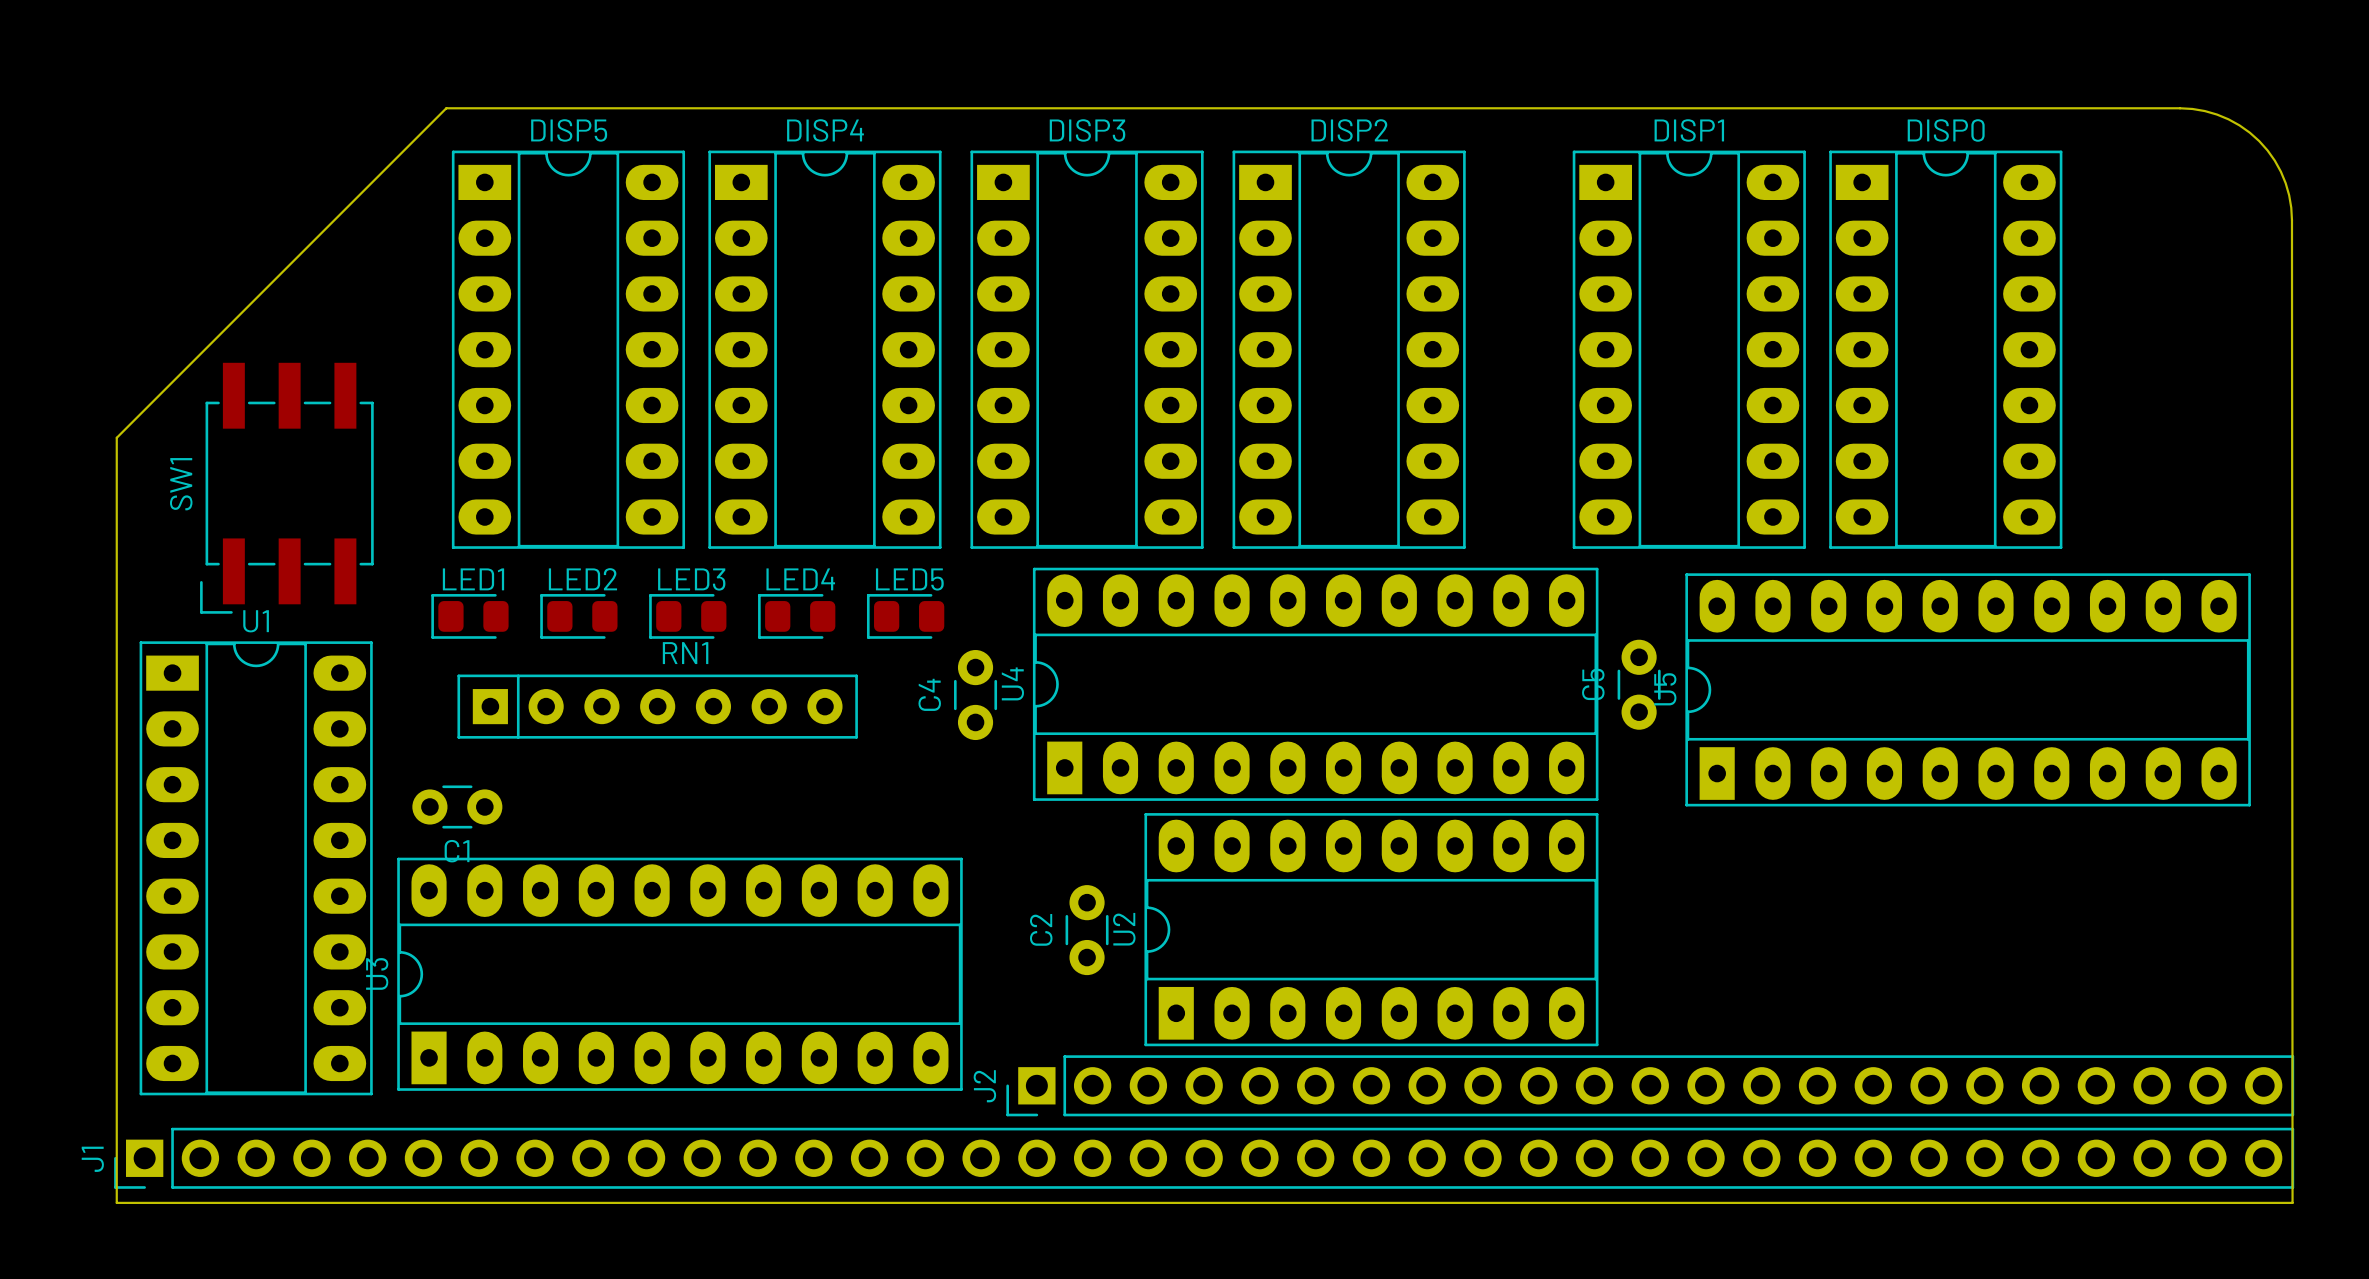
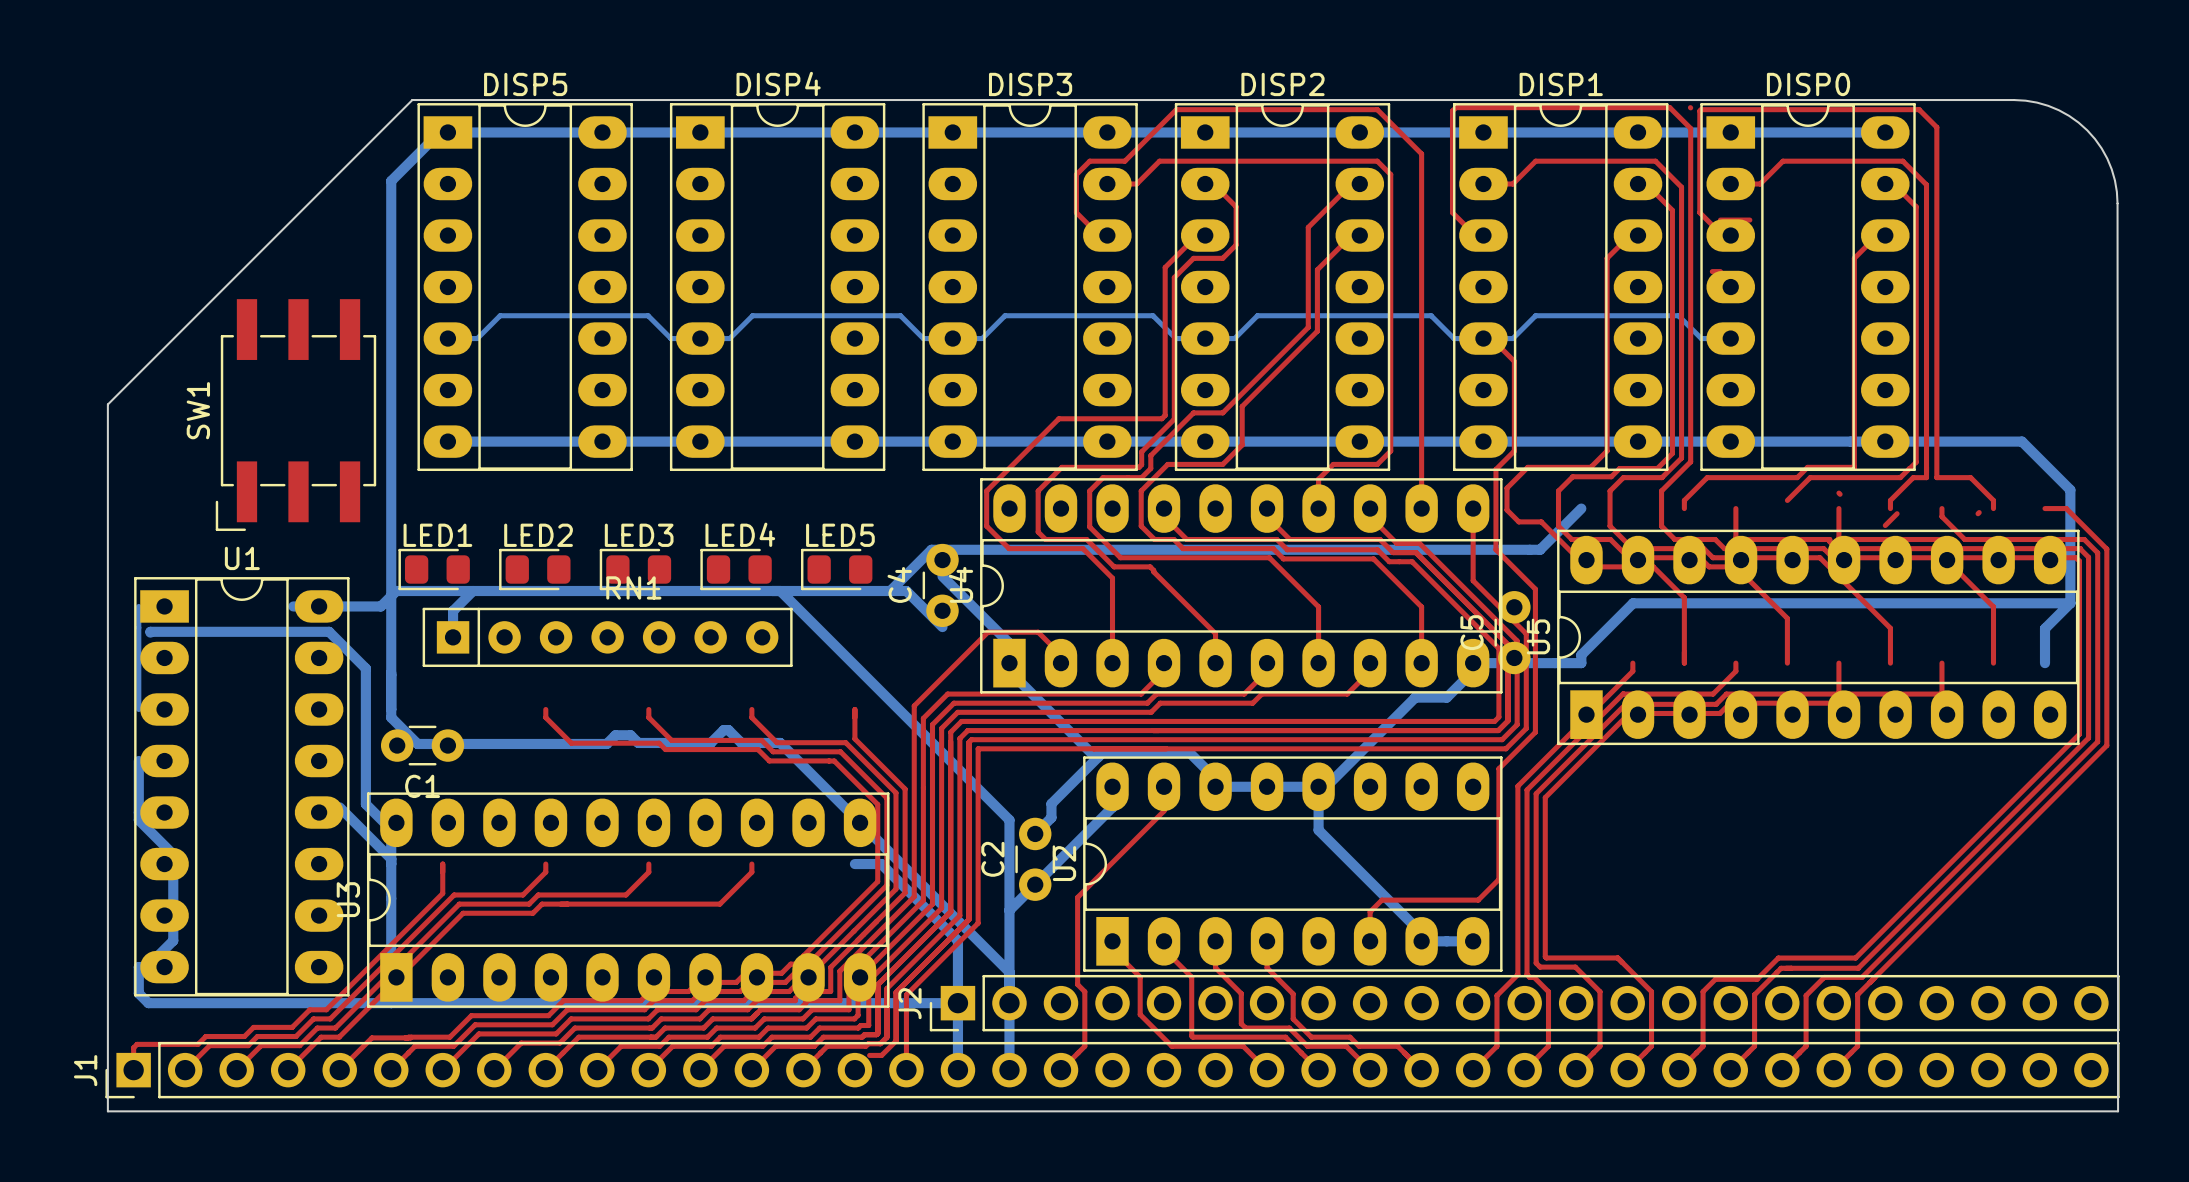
bottom track: none -> (1885, 132) (439, 132) (391, 181) (391, 717) (417, 743) (606, 743) (615, 735) (630, 735) (638, 742) (710, 742) (723, 730) (728, 730) (741, 742) (780, 742) (1009, 972)
top track: none -> (1107, 184) (1136, 184) (1159, 161) (1377, 161) (1390, 174) (1390, 451) (1377, 464) (1333, 464) (1318, 479) (1318, 508)
top track: none -> (1197, 184) (1213, 184) (1236, 206) (1236, 244) (1222, 258) (1193, 258) (1174, 277) (1174, 419) (1141, 451) (1141, 464) (1139, 467) (1061, 467) (1038, 491) (1038, 532) (1045, 539) (1086, 539) (1114, 566) (1150, 566) (1215, 633) (1215, 663)
top track: none -> (1359, 184) (1351, 184) (1308, 227) (1308, 327) (1222, 412) (1193, 412) (1150, 455) (1150, 468) (1141, 477) (1103, 477) (1089, 491) (1089, 526) (1120, 557) (1269, 557) (1318, 606) (1318, 663)
top track: none -> (1483, 184) (1512, 184) (1535, 161) (1655, 161) (1681, 187) (1681, 458) (1662, 477) (1623, 477) (1610, 491) (1610, 526) (1632, 548) (1703, 548) (1712, 557) (1819, 557) (1890, 628) (1890, 663)
top track: none -> (1646, 184) (1672, 210) (1672, 453) (1657, 468) (1619, 468) (1611, 476) (1572, 476) (1558, 491) (1558, 526) (1571, 539) (1610, 539) (1628, 557) (1700, 557) (1709, 566) (1735, 566) (1787, 618) (1787, 663)
top track: none -> (1730, 184) (1760, 184) (1782, 161) (1902, 161) (1926, 184) (1926, 477) (1913, 477) (1890, 500) (1890, 508)
top track: none -> (1885, 184) (1893, 184) (1916, 206) (1916, 462) (1900, 477) (1810, 477) (1787, 500)
top track: none -> (1720, 220) (1749, 220)
top track: none -> (1107, 235) (1099, 235) (1076, 212) (1076, 174) (1089, 161) (1124, 161) (1176, 109) (1377, 109) (1421, 153) (1421, 508)
top track: none -> (1205, 235) (1197, 235) (1165, 267) (1165, 415) (1161, 418) (1058, 418) (986, 491) (986, 526) (1009, 548) (1082, 548) (1112, 578) (1112, 663)
top track: none -> (1367, 235) (1351, 235) (1317, 269) (1317, 331) (1242, 406) (1242, 445) (1222, 464) (1167, 464) (1141, 491) (1141, 526) (1154, 539) (1173, 539) (1183, 548) (1273, 548) (1283, 558) (1373, 558) (1421, 606) (1421, 663)
top track: none -> (1488, 235) (1475, 235) (1452, 212) (1452, 110) (1455, 107) (1669, 107) (1690, 128) (1690, 461) (1661, 491) (1661, 526) (1674, 539) (1715, 539) (1724, 548) (1823, 548) (1832, 557) (1944, 557) (1993, 606) (1993, 663)
top track: none -> (1646, 235) (1629, 235) (1607, 258) (1607, 451) (1590, 467) (1527, 467) (1507, 488) (1507, 510) (1518, 521) (1541, 521) (1586, 566) (1653, 566) (1684, 597) (1684, 663)
top track: none -> (1730, 235) (1722, 235) (1699, 212) (1701, 109) (1919, 109) (1936, 127) (1936, 477) (1970, 477) (1993, 500) (1993, 508)
top track: none -> (1885, 235) (1877, 235) (1854, 258) (1854, 467)
top track: none -> (1712, 271) (1720, 271)
DISP5 position: (568, 349) -> (525, 287)
DISP4 position: (824, 349) -> (777, 287)
DISP3 position: (1087, 349) -> (1030, 287)
DISP2 position: (1349, 349) -> (1282, 287)
DISP1 position: (1689, 349) -> (1560, 287)
DISP0 position: (1945, 349) -> (1808, 287)
bottom track: none -> (447, 338) (477, 338) (500, 315) (648, 315) (670, 338) (729, 338) (752, 315) (900, 315) (923, 338) (982, 338) (1005, 315) (1153, 315) (1175, 338) (1234, 338) (1257, 315) (1431, 315) (1454, 338) (1512, 338) (1535, 315) (1678, 315) (1701, 338) (1730, 338)
top track: none -> (1483, 338) (1491, 338) (1514, 361) (1514, 451) (1495, 469) (1495, 549) (1535, 589) (1535, 732) (1498, 768) (1498, 879) (1478, 900) (1381, 900) (1370, 911) (1370, 941)
bottom track: none -> (447, 441) (2022, 441) (2070, 489) (2070, 603)
SW1 position: (286, 488) -> (295, 415)
top track: none -> (1854, 467) (1807, 467) (1797, 477) (1707, 477) (1684, 500) (1684, 508)
top track: none -> (1838, 493) (1840, 494)
top track: none -> (1164, 508) (1164, 516) (1186, 539) (1276, 539) (1287, 549) (1377, 549) (1389, 561) (1412, 561) (1498, 648) (1498, 717) (1494, 721) (961, 721) (950, 732) (950, 911) (877, 984) (877, 1033) (864, 1034) (862, 1037) (823, 1037) (814, 1046) (775, 1046) (751, 1070)
top track: none -> (1267, 508) (1267, 516) (1289, 539) (1380, 539) (1393, 552) (1415, 552) (1508, 644) (1508, 720) (1498, 730) (967, 730) (959, 738) (959, 915) (887, 988) (887, 1037) (880, 1043) (868, 1043) (865, 1046) (827, 1046) (803, 1070)
top track: none -> (1370, 508) (1370, 516) (1396, 543) (1419, 543) (1517, 640) (1517, 724) (1502, 739) (971, 739) (969, 742) (969, 919) (896, 992) (896, 1040) (881, 1055) (869, 1055)
top track: none -> (1473, 508) (1473, 580) (1526, 633) (1526, 728) (1505, 748) (978, 748) (978, 923) (906, 994) (906, 1070)
bottom track: none -> (1581, 508) (1540, 549) (931, 549) (890, 591)
top track: none -> (1735, 508) (1737, 539) (1829, 539) (1836, 548) (1948, 548) (1957, 557) (2076, 557) (2079, 561) (2079, 734) (1855, 958) (1778, 958) (1757, 979) (1715, 979) (1703, 991) (1703, 1046) (1679, 1070)
top track: none -> (1838, 508) (1840, 539) (1951, 539) (1961, 548) (2080, 548) (2088, 557) (2088, 738) (1858, 968) (1781, 968) (1754, 994) (1754, 1046) (1730, 1070)
top track: none -> (1941, 508) (1941, 516) (1964, 539) (2084, 539) (2097, 552) (2097, 741) (1862, 977) (1824, 977) (1806, 995) (1806, 1046) (1782, 1070)
top track: none -> (2045, 508) (2066, 508) (2106, 549) (2106, 745) (1857, 994) (1857, 1046) (1833, 1070)
top track: none -> (1979, 512) (1978, 513)
top track: none -> (1897, 513) (1885, 525)
bottom track: none -> (942, 576) (1009, 643) (1009, 671) (1095, 757) (1098, 757)
bottom track: none -> (473, 591) (453, 611) (453, 637)
bottom track: none -> (780, 591) (1009, 820) (1009, 1070)
bottom track: none -> (2070, 603) (2045, 628) (2045, 663)
bottom track: none -> (2070, 603) (1633, 603) (1581, 655) (1581, 663) (1473, 663) (1473, 671) (1446, 697) (1415, 697) (1326, 786) (1215, 786) (1215, 778) (1189, 752) (1103, 752) (1051, 803) (1051, 817) (1035, 833)
bottom track: none -> (138, 606) (138, 709)
bottom track: none -> (293, 606) (380, 606) (396, 591) (906, 591) (942, 627)
bottom track: none -> (150, 632) (329, 631) (365, 668) (365, 804) (391, 829) (391, 1003)
U4 position: (1315, 684) -> (1241, 585)
C4 position: (975, 695) -> (942, 585)
RN1 position: (657, 706) -> (607, 637)
top track: none -> (1060, 663) (1060, 655) (1038, 632) (987, 632) (914, 705) (914, 896) (839, 971) (839, 1000) (805, 1000) (799, 1009) (760, 1009) (751, 1018) (712, 1018) (703, 1028) (665, 1028) (655, 1037) (578, 1037) (545, 1070)
top track: none -> (1164, 663) (1164, 671) (1141, 694) (947, 694) (923, 718) (923, 900) (848, 974) (848, 1009) (812, 1009) (802, 1018) (764, 1018) (755, 1028) (716, 1028) (707, 1037) (668, 1037) (659, 1046) (621, 1046) (597, 1070)
top track: none -> (1267, 663) (1267, 671) (1244, 694) (1156, 694) (1147, 703) (953, 703) (932, 724) (932, 904) (858, 978) (858, 1015) (854, 1018) (815, 1018) (806, 1028) (768, 1028) (759, 1037) (720, 1037) (711, 1046) (672, 1046) (648, 1070)
top track: none -> (1370, 663) (1370, 671) (1347, 694) (1261, 694) (1252, 703) (1160, 703) (1151, 712) (957, 712) (941, 728) (941, 908) (868, 980) (868, 1025) (860, 1025) (858, 1028) (819, 1028) (810, 1037) (771, 1037) (762, 1046) (724, 1046) (700, 1070)
top track: none -> (1632, 663) (1632, 671) (1517, 786) (1517, 974) (1496, 995) (1496, 1046) (1473, 1070)
top track: none -> (1735, 663) (1735, 671) (1713, 694) (1623, 694)
top track: none -> (1838, 663) (1837, 694) (1726, 694) (1716, 704) (1625, 704) (1536, 793) (1536, 963) (1540, 967) (1575, 967) (1600, 991) (1600, 1046) (1576, 1070)
top track: none -> (1941, 663) (1940, 694) (1848, 694) (1841, 703) (1730, 703) (1719, 713) (1629, 713) (1545, 797) (1545, 956) (1617, 957) (1651, 991) (1651, 1046) (1627, 1070)
top track: none -> (1623, 693) (1527, 789) (1527, 974) (1529, 977) (1534, 977) (1548, 991) (1548, 1046) (1524, 1070)
top track: none -> (545, 709) (545, 717) (571, 743) (659, 743) (665, 749) (758, 749) (769, 760) (834, 761) (877, 804) (877, 881) (803, 956) (803, 962) (801, 964) (790, 964) (781, 973) (745, 973) (736, 982) (697, 982) (688, 991) (649, 991) (640, 1000) (563, 1000) (548, 1015) (471, 1015) (449, 1037) (408, 1037)
top track: none -> (648, 709) (648, 717) (671, 740) (761, 740) (773, 751) (840, 751) (886, 798) (886, 885) (812, 959) (812, 973) (794, 973) (785, 982) (749, 982) (740, 991) (701, 991) (692, 1000) (653, 1000) (644, 1009) (567, 1009) (552, 1024) (475, 1024) (453, 1046) (415, 1046) (391, 1070)
top track: none -> (751, 709) (751, 717) (776, 742) (845, 742) (895, 792) (895, 889) (821, 963) (821, 979) (818, 982) (798, 982) (789, 991) (753, 991) (743, 1000) (705, 1000) (696, 1009) (657, 1009) (648, 1018) (571, 1018) (556, 1033) (478, 1033) (442, 1070)
top track: none -> (854, 709) (854, 738) (905, 789) (905, 892) (830, 967) (830, 991)
bottom track: none -> (138, 761) (138, 820) (173, 854) (173, 940) (146, 967) (138, 967) (138, 993) (148, 1003) (957, 1003)
top track: none -> (1164, 781) (1164, 811) (1077, 897) (1077, 984) (1084, 991) (1084, 1046) (1060, 1070)
bottom track: none -> (1112, 786) (1112, 807) (1009, 910)
bottom track: none -> (1318, 786) (1318, 830) (1429, 941) (1473, 941)
U1 position: (256, 868) -> (241, 786)
bottom track: none -> (339, 807) (391, 858)
U2 position: (1371, 929) -> (1292, 864)
C2 position: (1087, 930) -> (1035, 859)
top track: none -> (442, 864) (442, 893) (326, 1009) (309, 1009) (292, 1027) (253, 1027) (244, 1036) (205, 1036) (198, 1044) (137, 1044) (133, 1047) (133, 1070)
top track: none -> (545, 864) (545, 872) (522, 894) (454, 894) (330, 1018) (313, 1018) (296, 1036) (257, 1036) (248, 1045) (209, 1045) (185, 1070)
top track: none -> (648, 864) (648, 872) (626, 894) (538, 894) (529, 904) (459, 904) (335, 1028) (317, 1028) (299, 1045) (261, 1045) (236, 1070)
top track: none -> (751, 864) (751, 872) (719, 904) (542, 904) (532, 913) (463, 913) (339, 1037) (321, 1037) (288, 1070)
bottom track: none -> (854, 864) (881, 864) (957, 940) (957, 1070)
top track: none -> (1112, 941) (1112, 949) (1140, 977) (1140, 1014) (1171, 1046) (1243, 1046) (1267, 1070)
top track: none -> (1164, 941) (1164, 949) (1191, 977) (1192, 1037) (1285, 1037) (1318, 1070)
top track: none -> (1215, 941) (1215, 967) (1241, 993) (1241, 1023) (1245, 1028) (1289, 1028) (1307, 1046) (1346, 1046) (1370, 1070)
top track: none -> (1267, 941) (1267, 967) (1293, 994) (1293, 1018) (1311, 1037) (1350, 1037) (1359, 1046) (1397, 1046) (1421, 1070)
top track: none -> (830, 991) (802, 991) (795, 1000) (756, 1000) (747, 1009) (709, 1009) (699, 1018) (661, 1018) (652, 1028) (574, 1028) (559, 1043) (521, 1043) (494, 1070)
top track: none -> (411, 1037) (371, 1037) (339, 1070)

